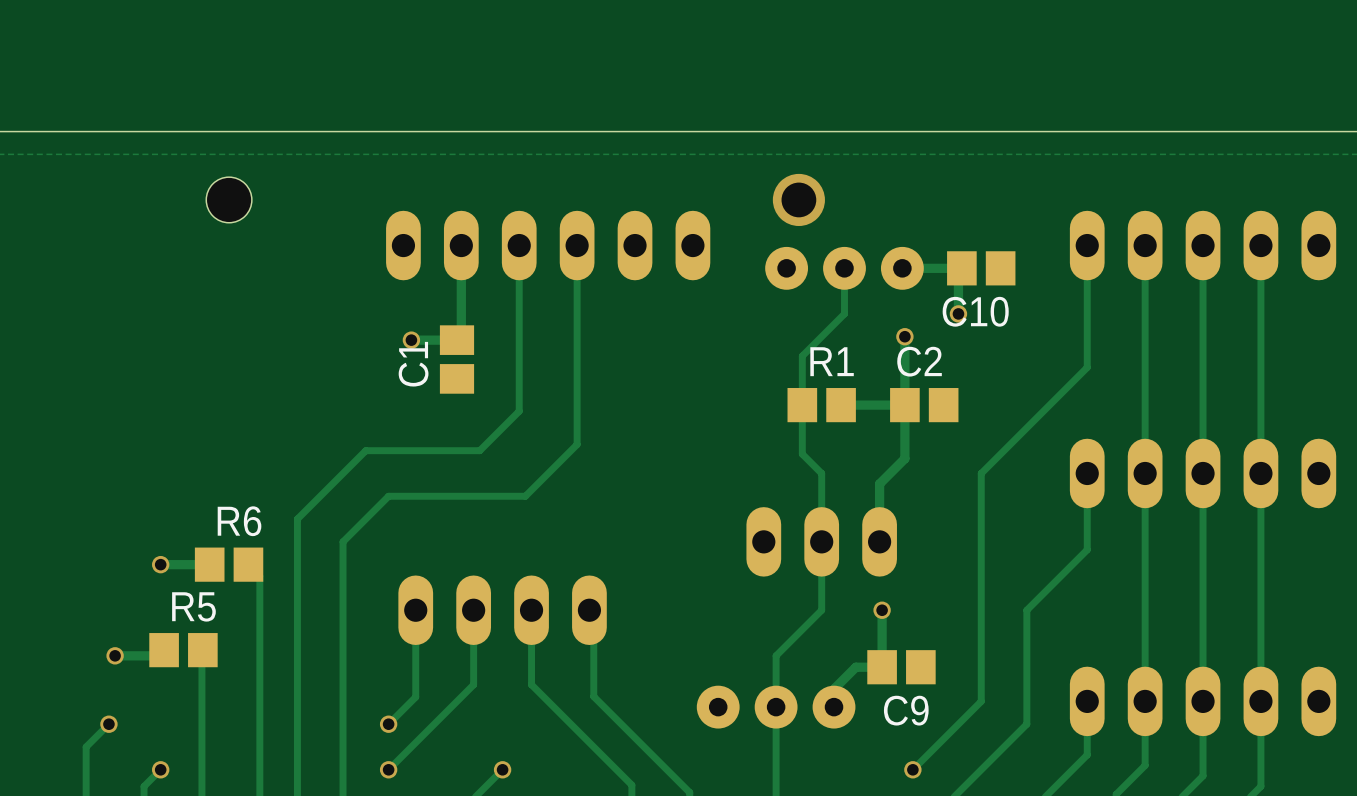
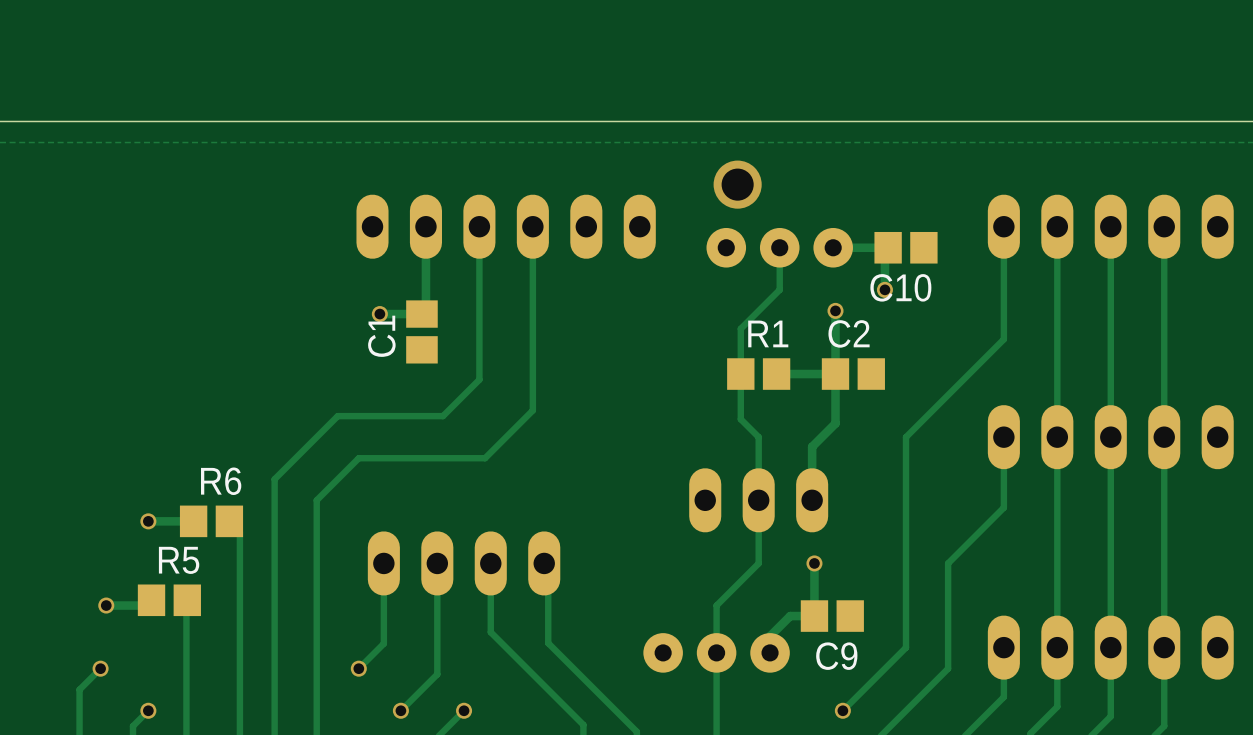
hole: (229, 199) -> none
track: (473, 684) (388, 769) -> (437, 632) (437, 674) (400, 710)
via position: (388, 769) -> (400, 710)

